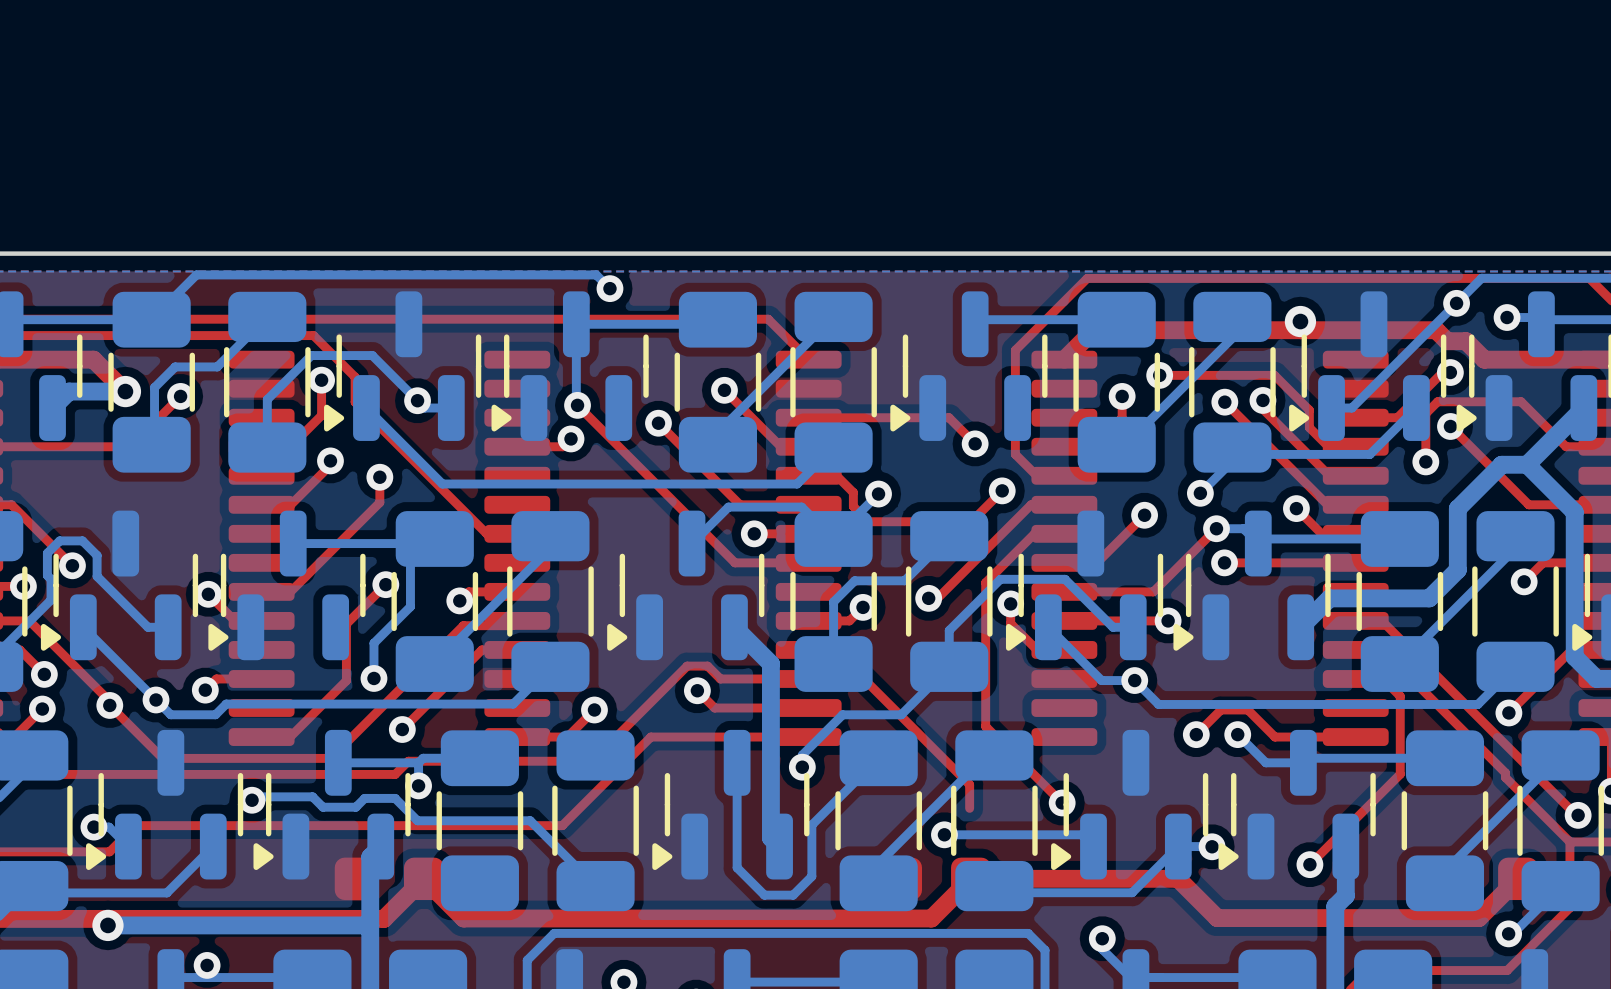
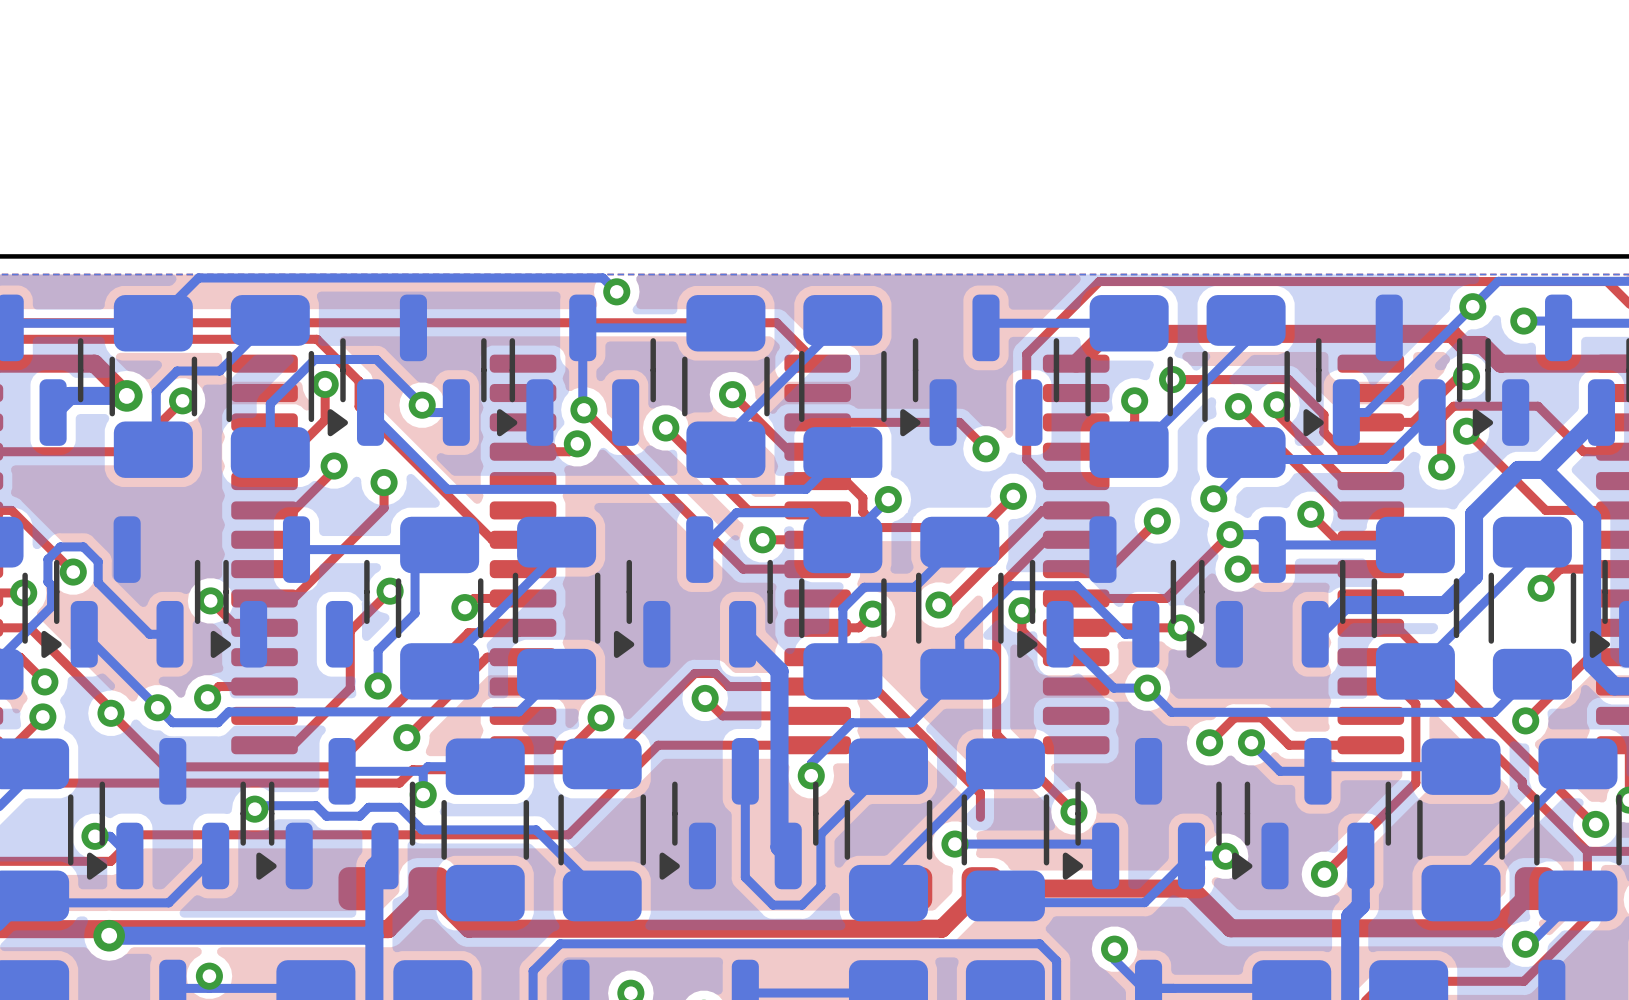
via: (1300, 321) -> none

